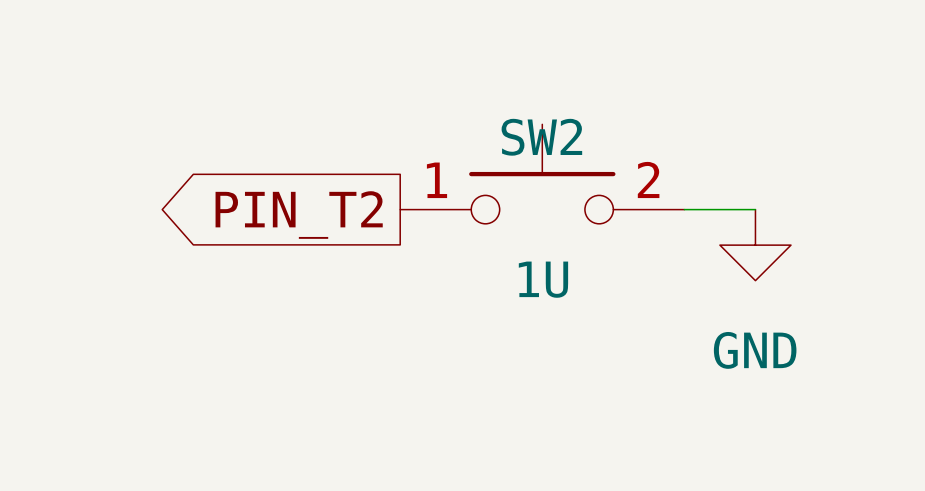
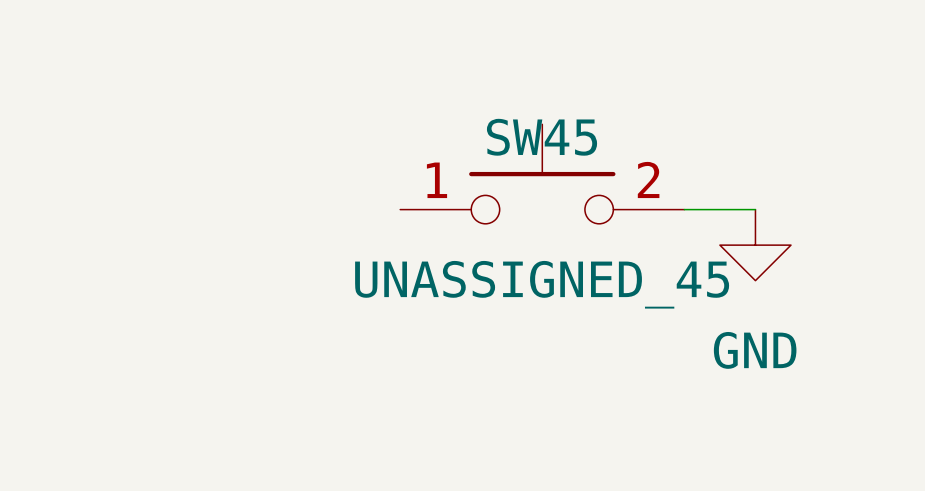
SW2 name: SW2 (541, 137) -> SW45 (542, 137)
global label: PIN_T2 (299, 215) -> none
SW2 value: 1U (543, 279) -> UNASSIGNED_45 (542, 284)

